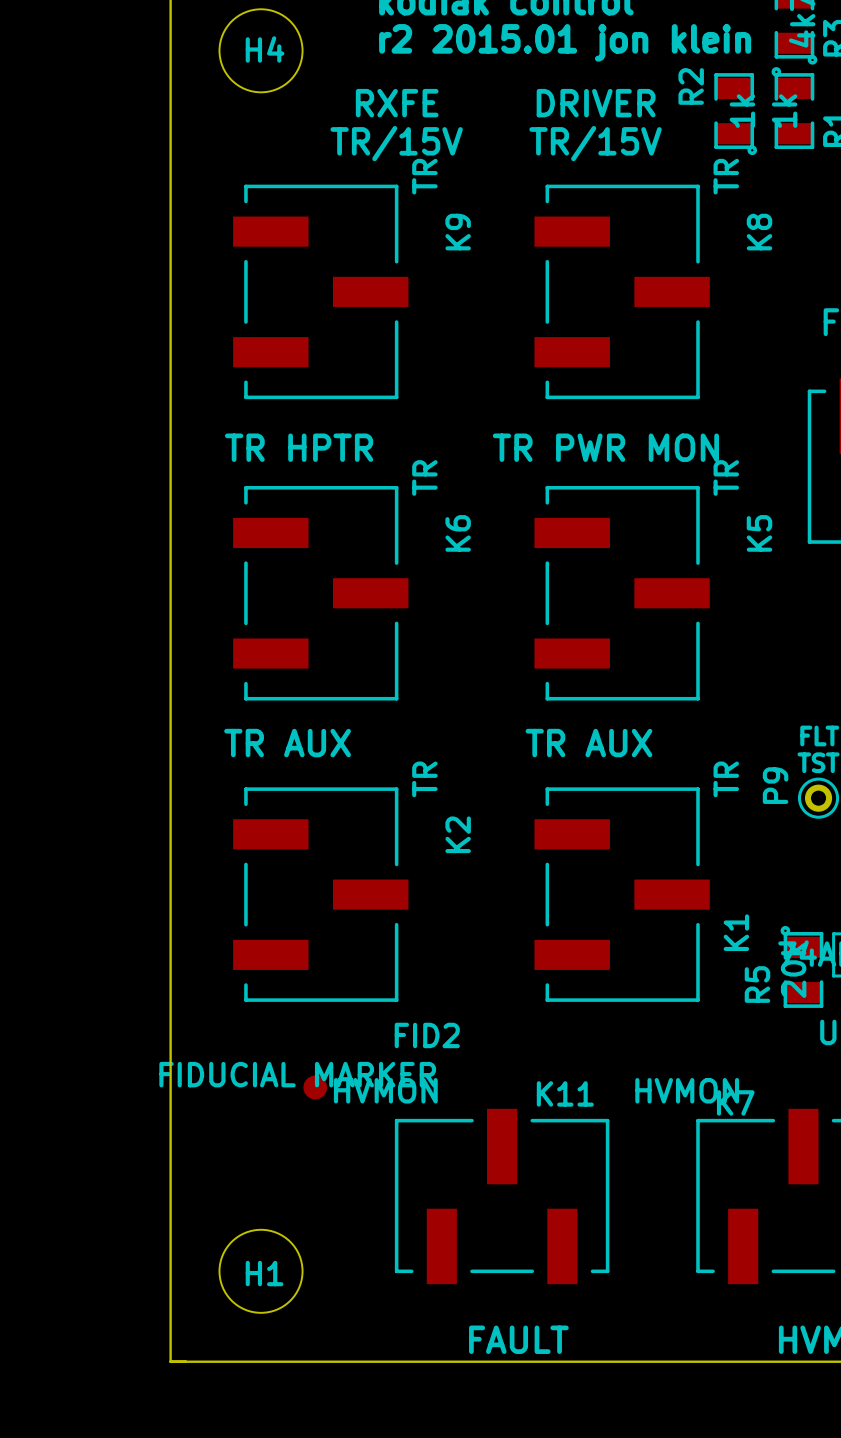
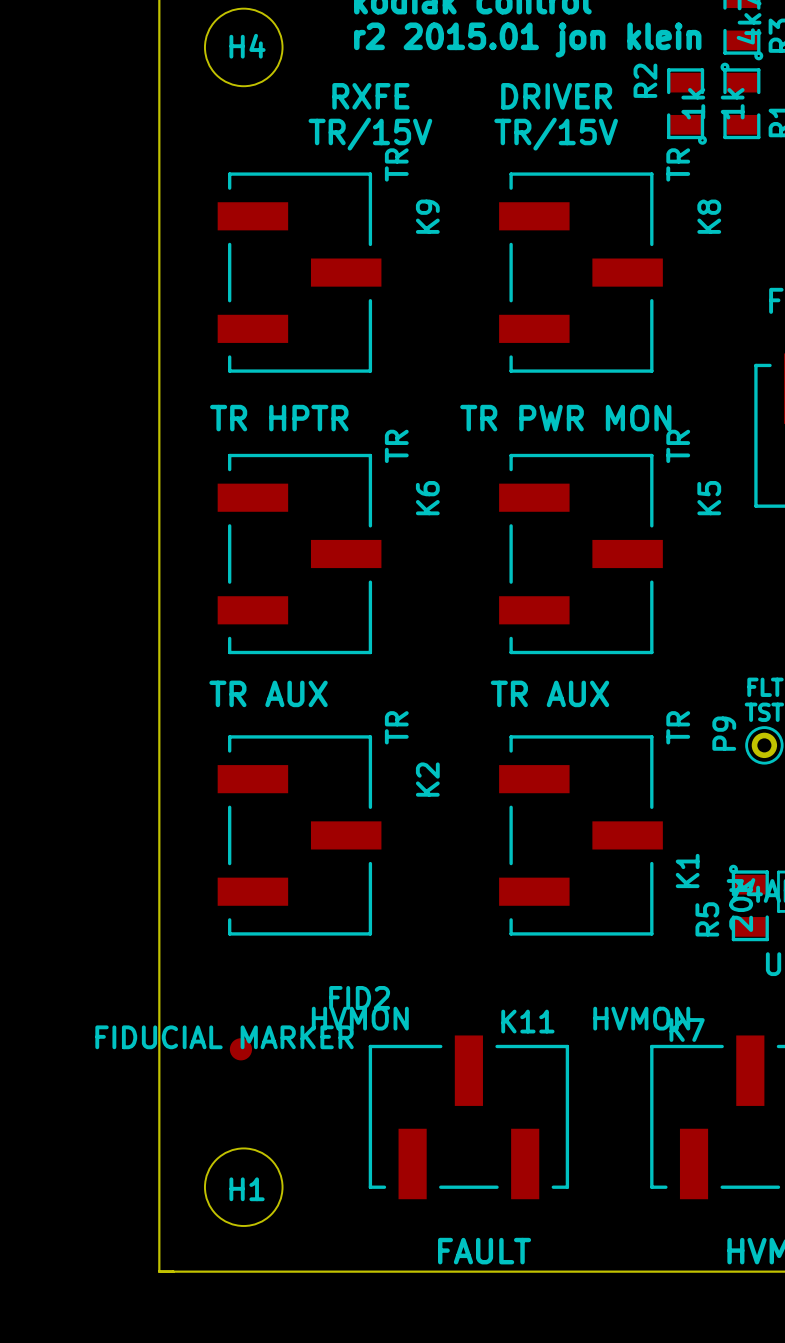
FID2 name position: FID2 (427, 1035) -> FID2 (359, 997)
FID2 position: (315, 1087) -> (240, 1049)

